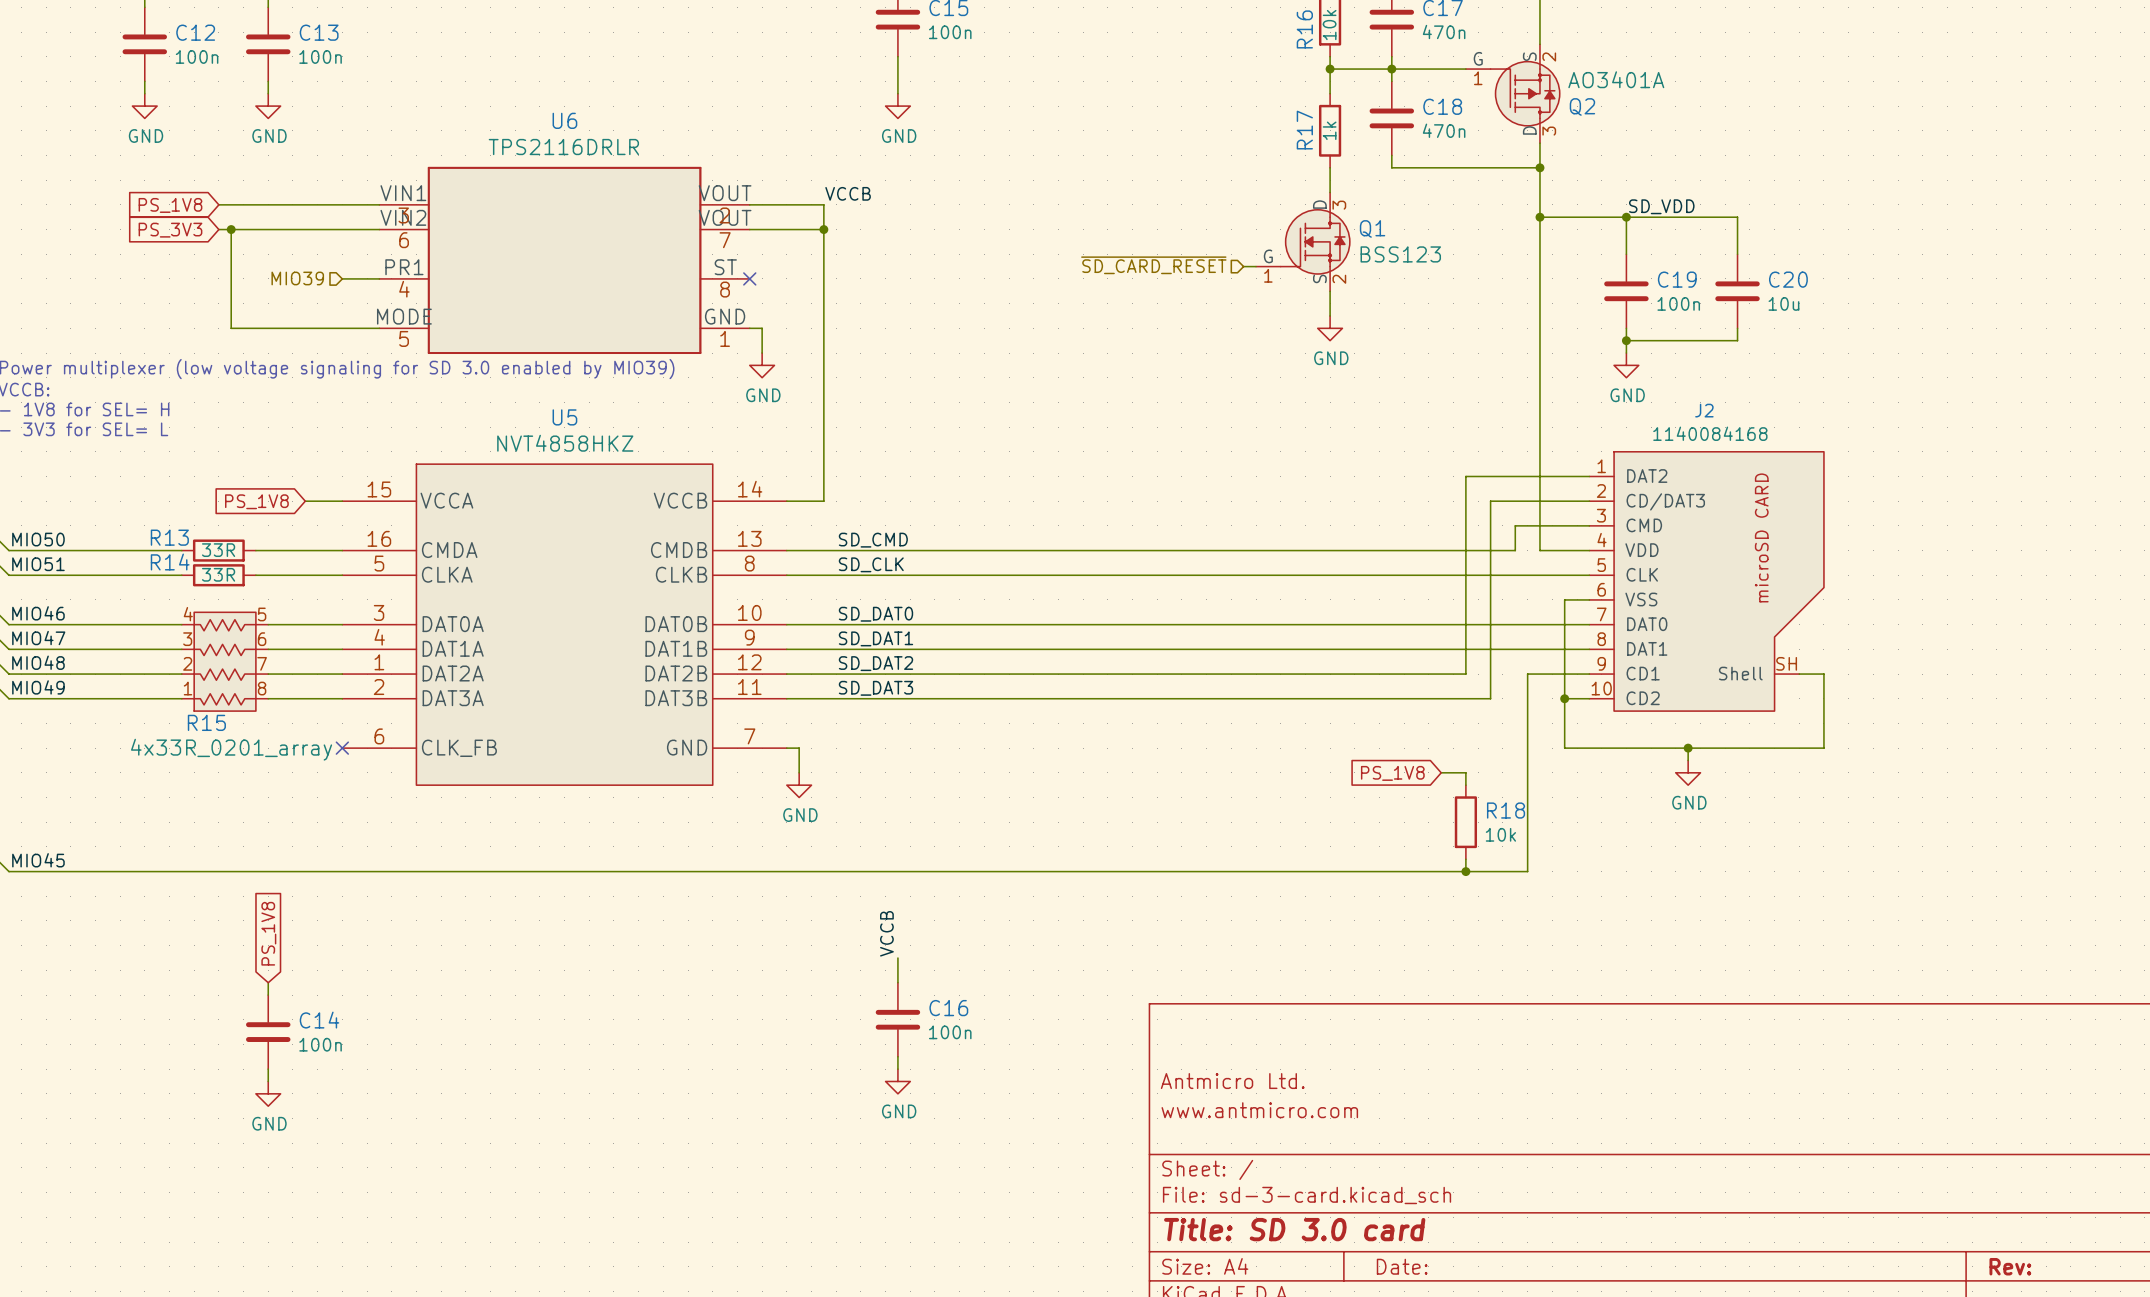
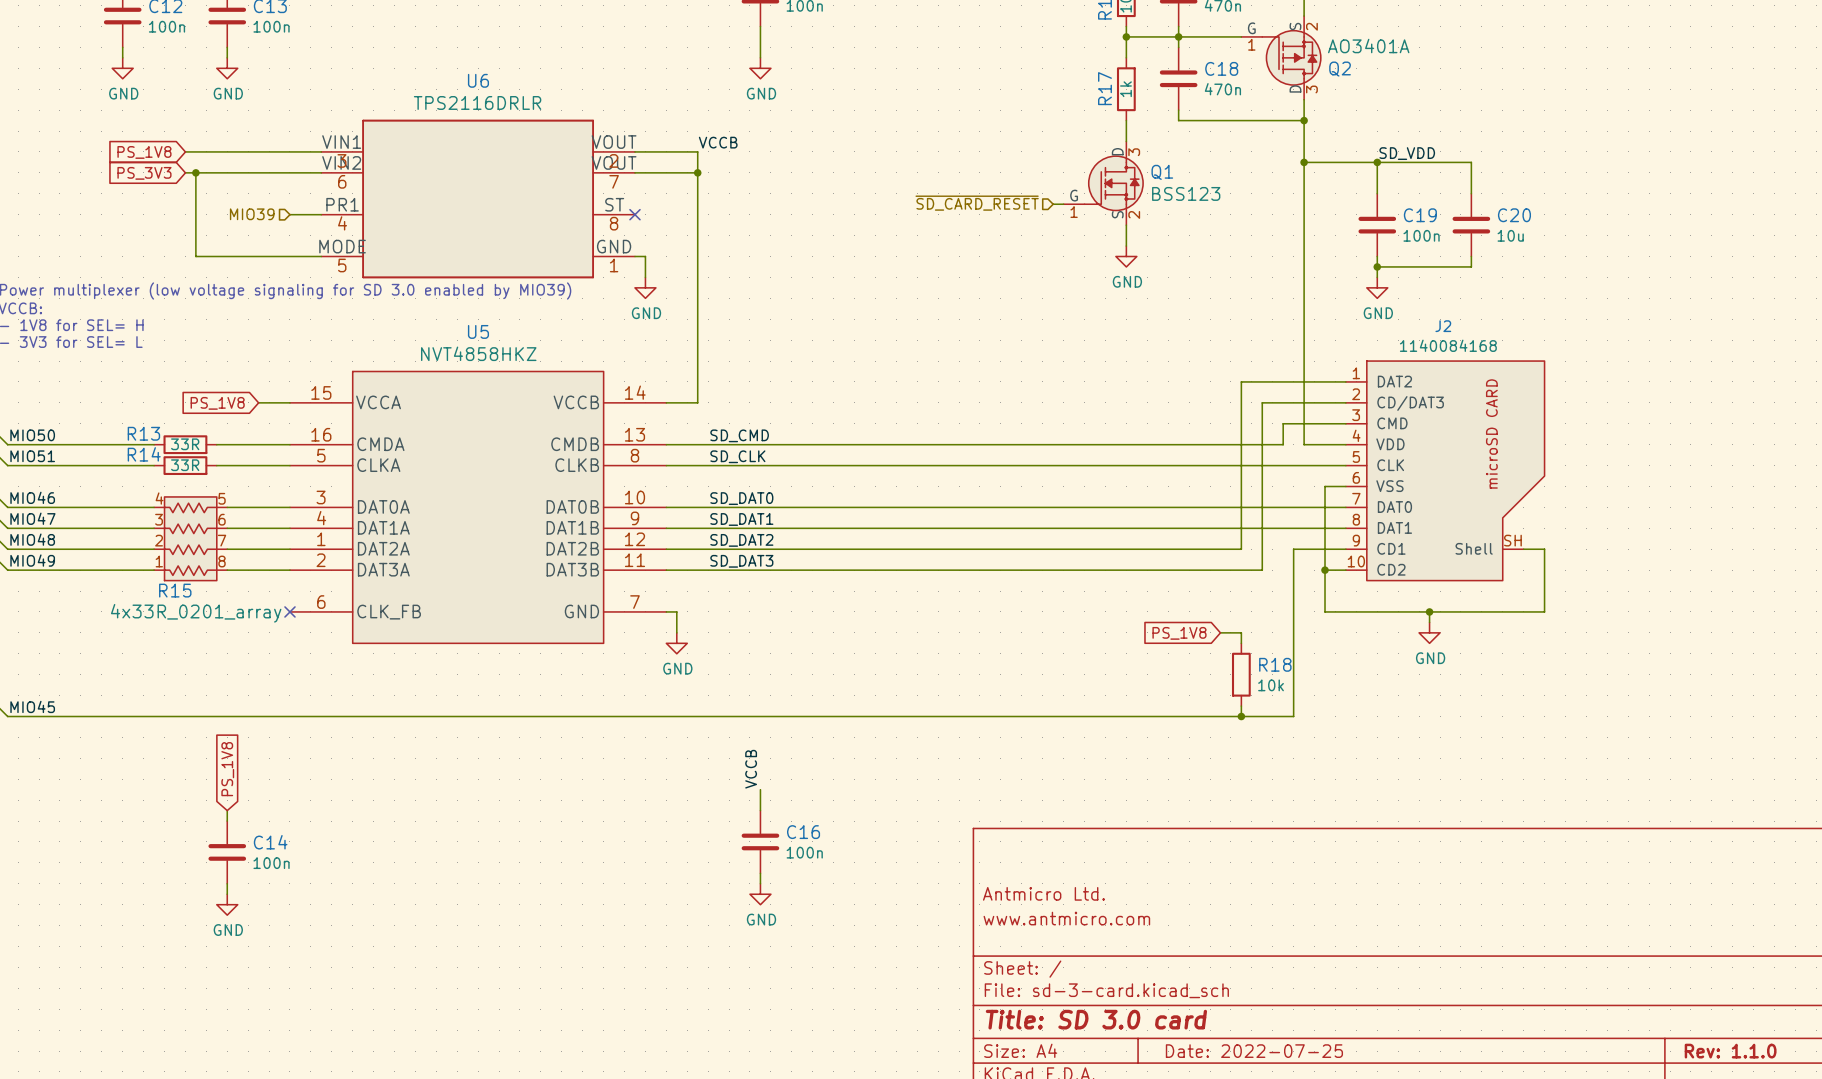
title block: Date: (1402, 1266) -> Date: 2022-07-25 (1254, 1051)
title block: Rev: (2010, 1266) -> Rev: 1.1.0 (1730, 1051)

